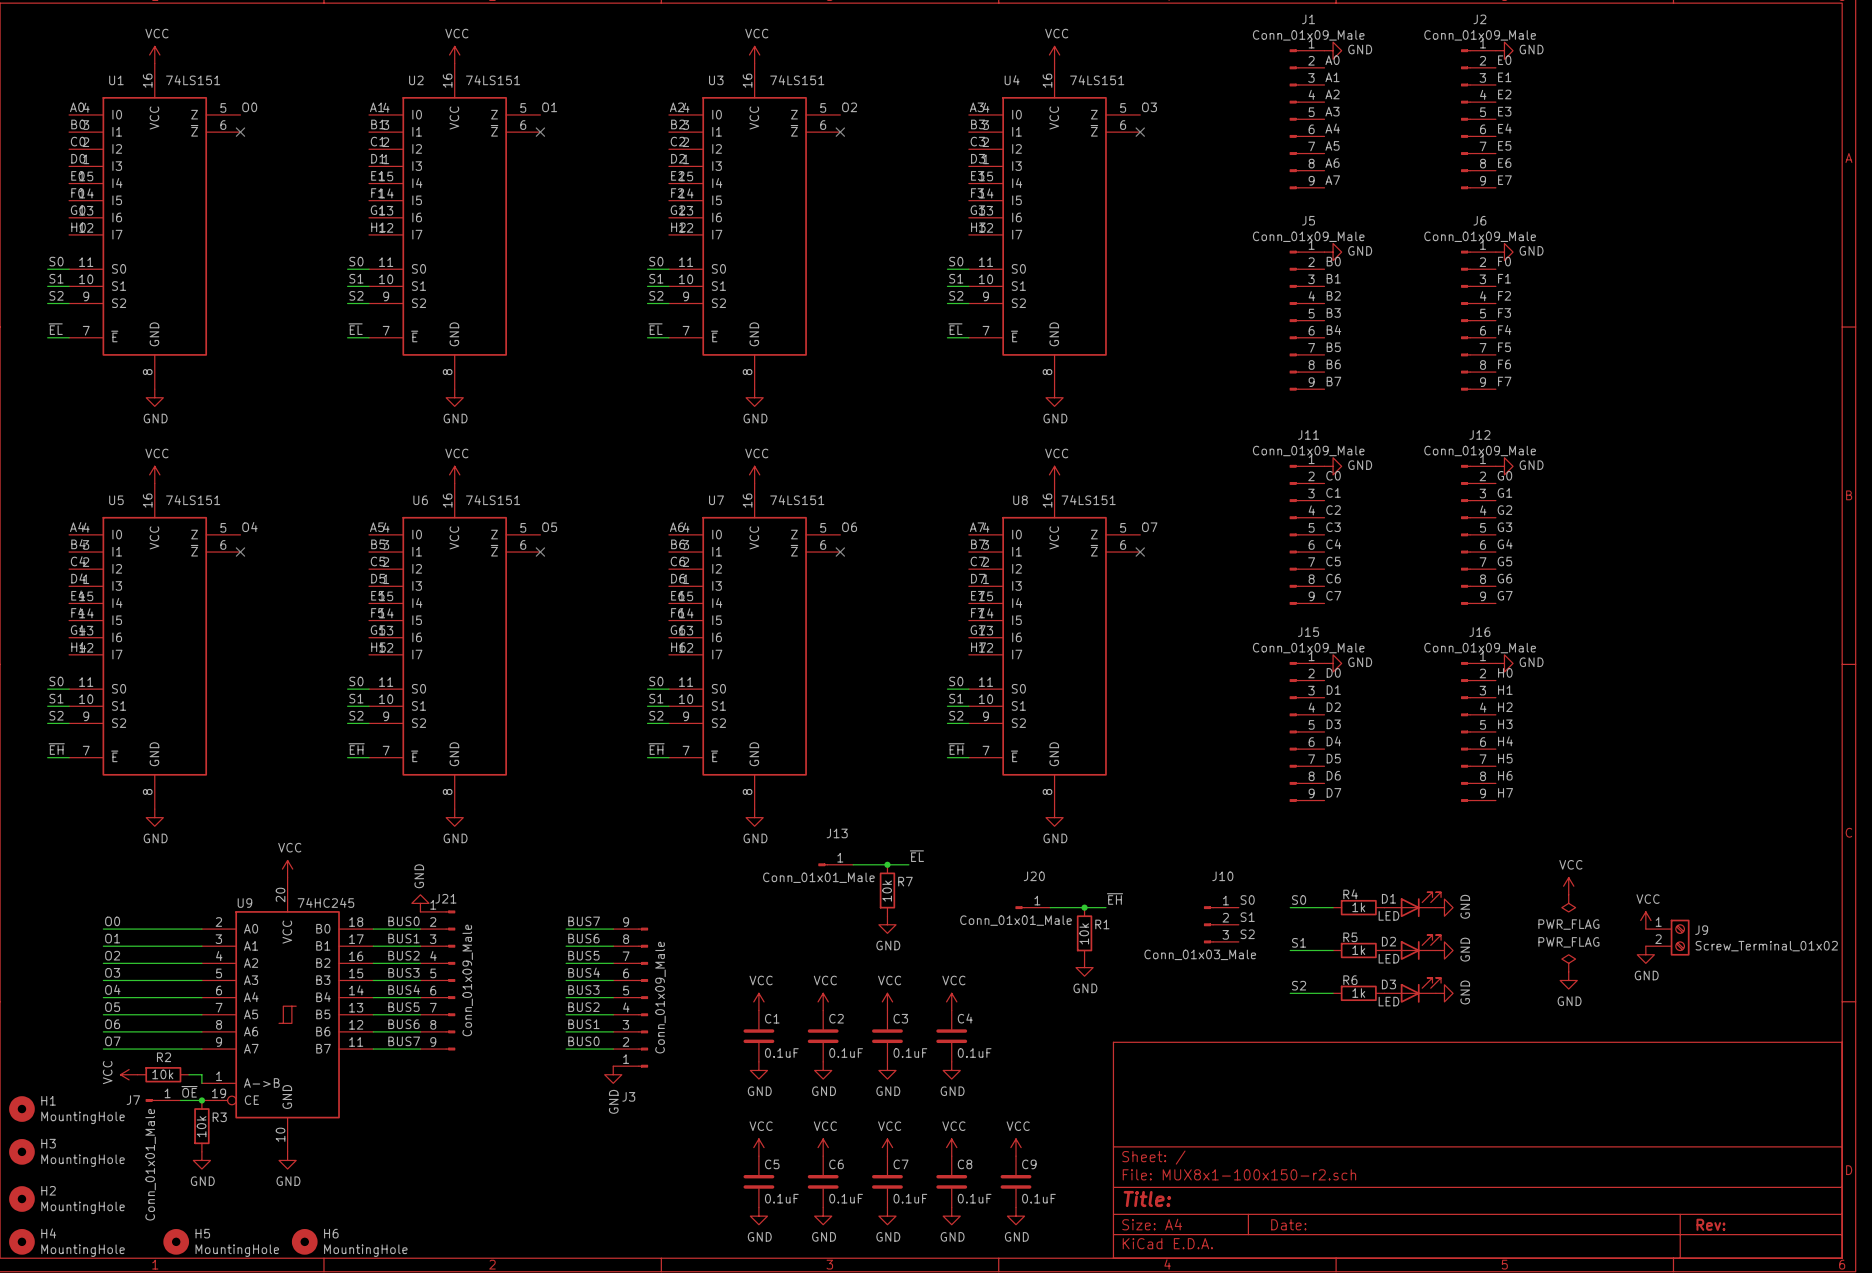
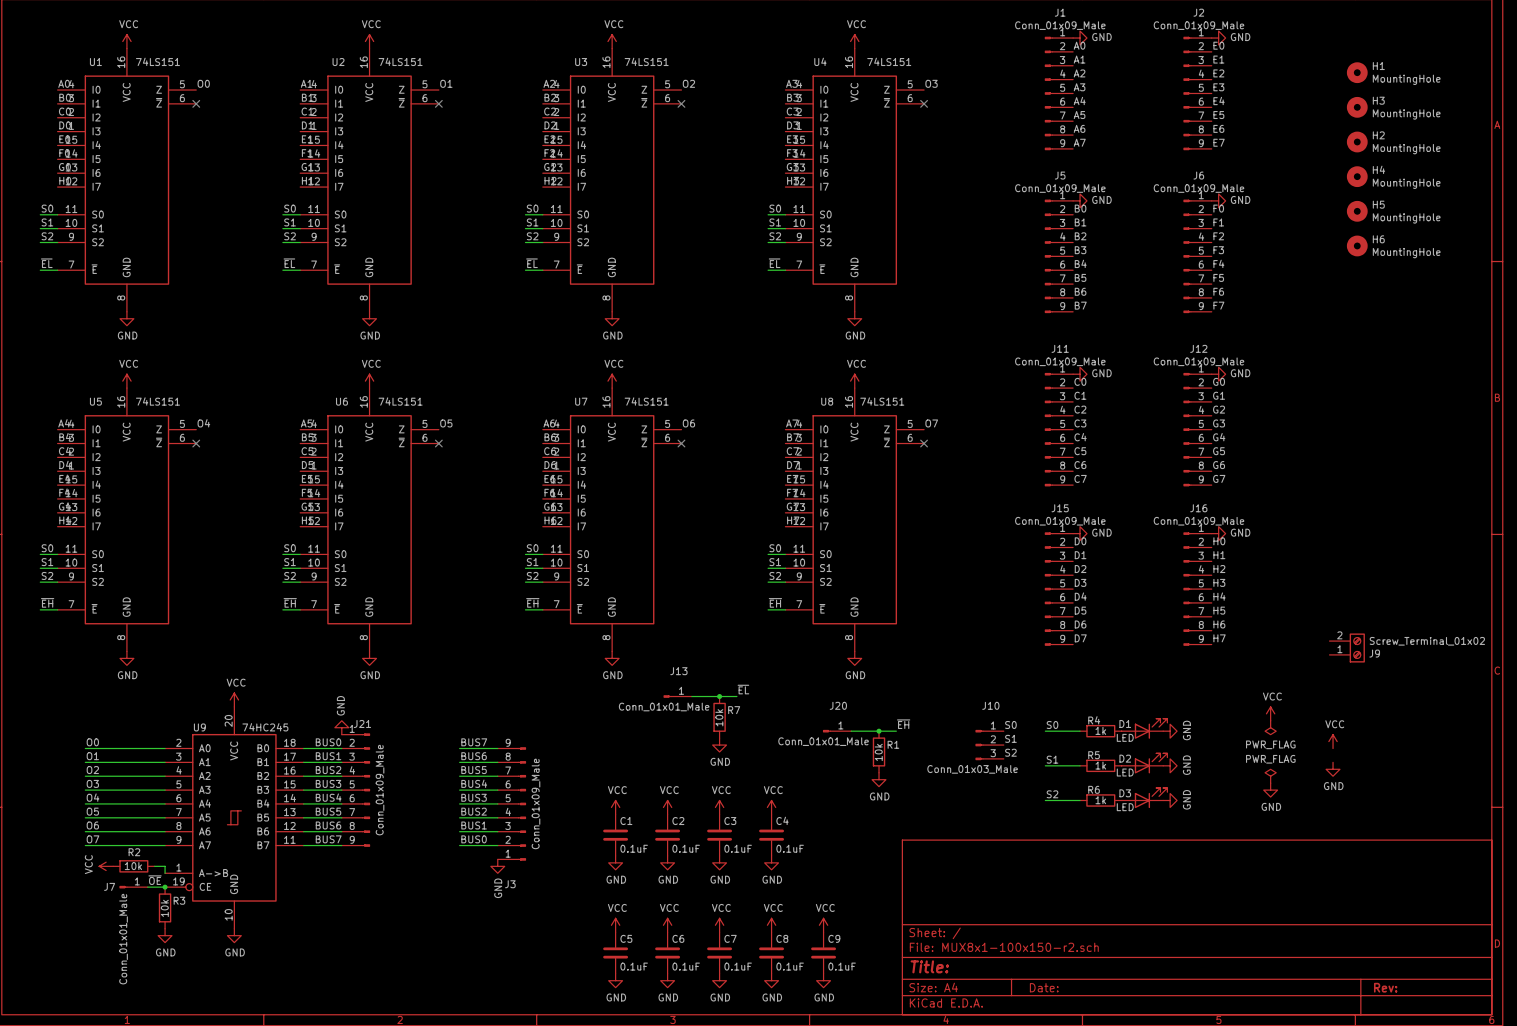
J9 position: (1667, 937) -> (1347, 648)
J9 flip: as is (1680, 937) -> up-down (1357, 648)
H1 position: (21, 1109) -> (1357, 72)
H3 position: (21, 1151) -> (1357, 107)
H2 position: (21, 1199) -> (1357, 142)
H4 position: (21, 1241) -> (1357, 176)
H5 position: (176, 1241) -> (1357, 211)
H6 position: (304, 1241) -> (1357, 245)

